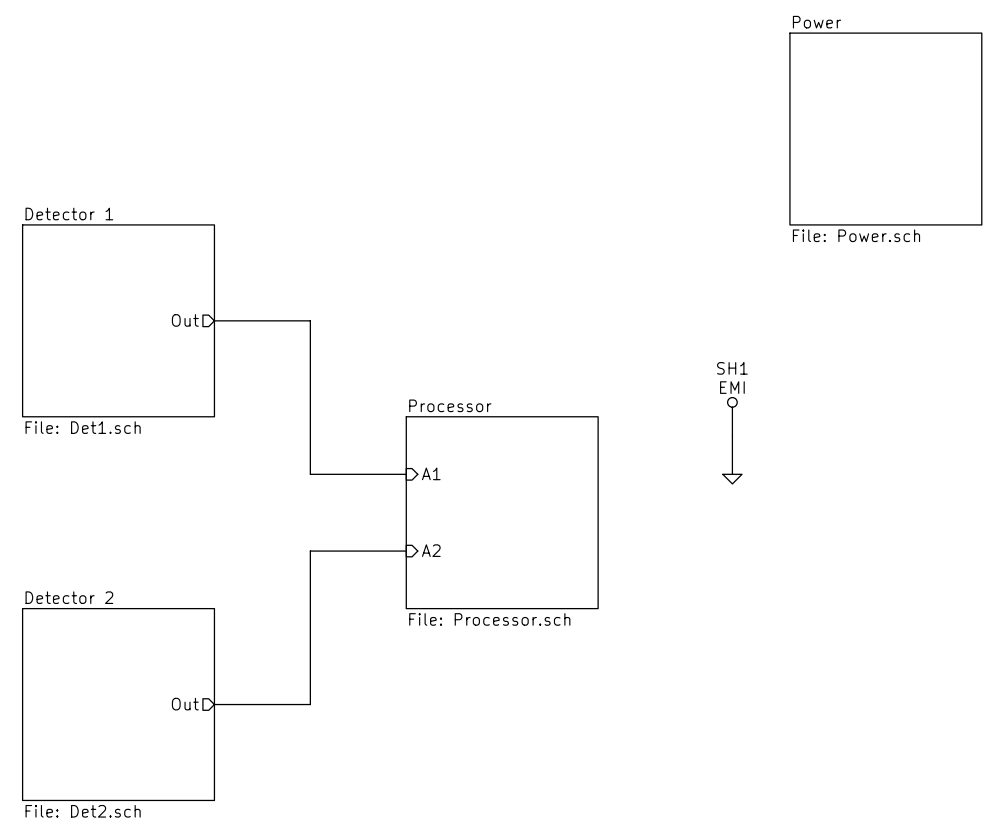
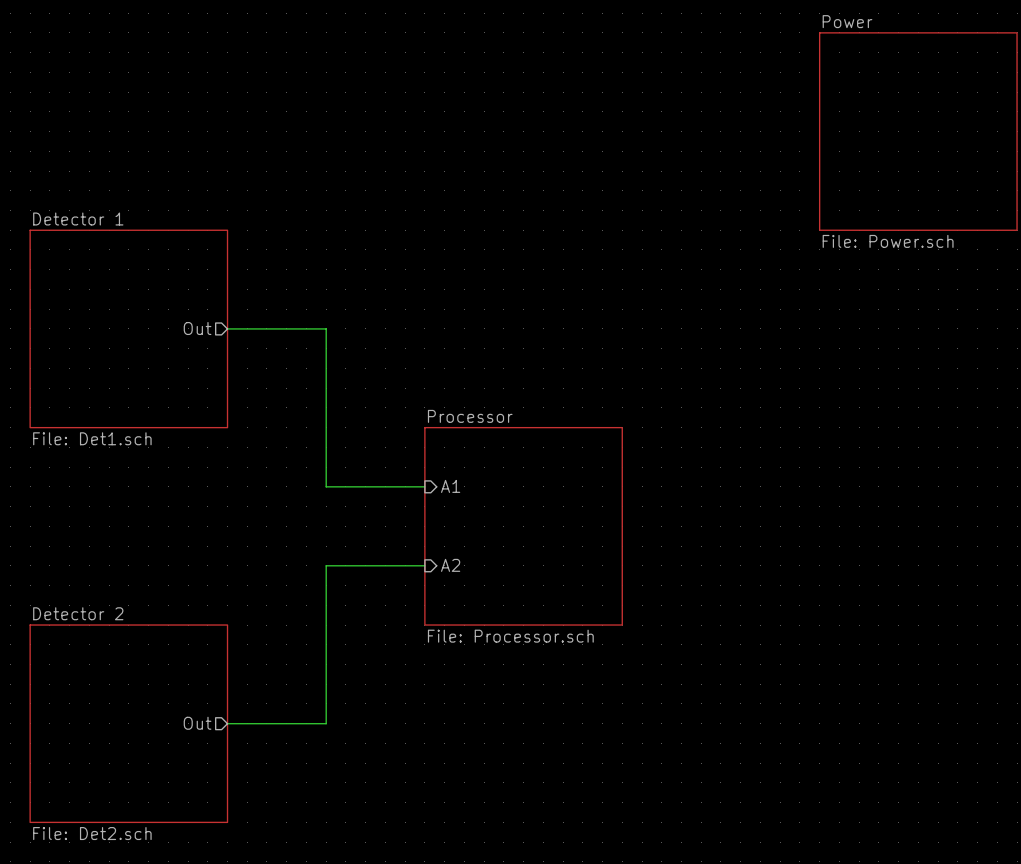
SH1: EMI (732, 416) -> none
wire: (732, 435) (732, 474) -> none
power symbol: (732, 479) -> none

